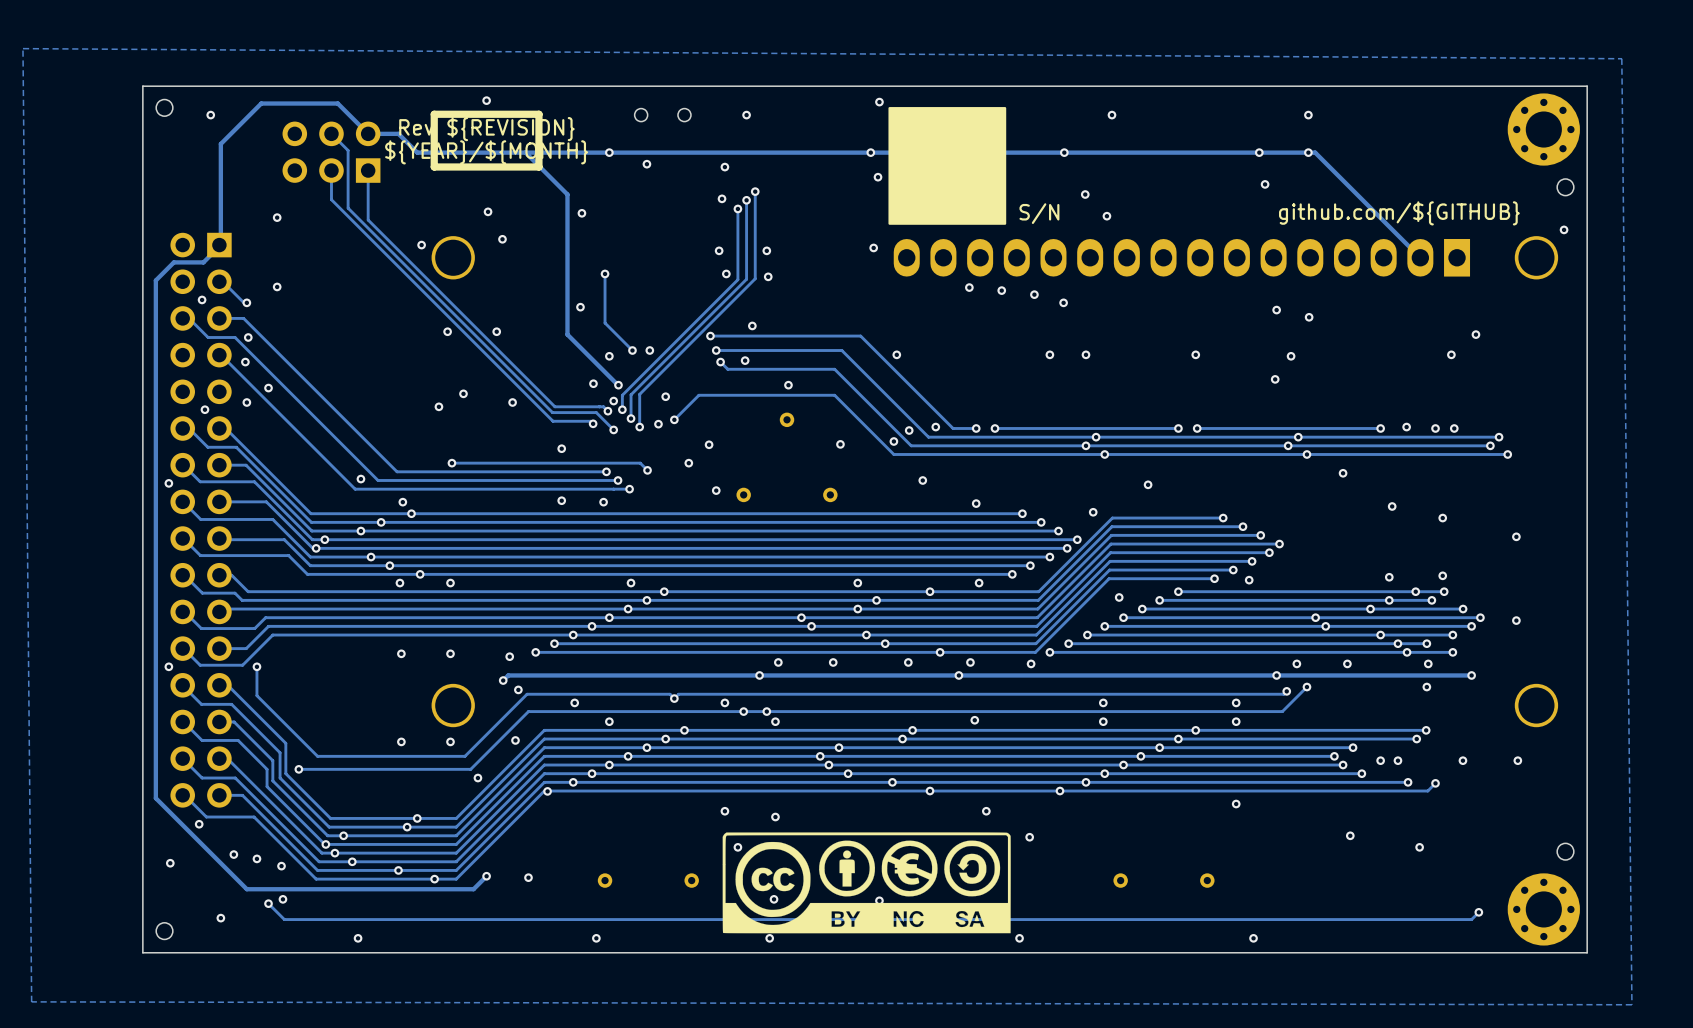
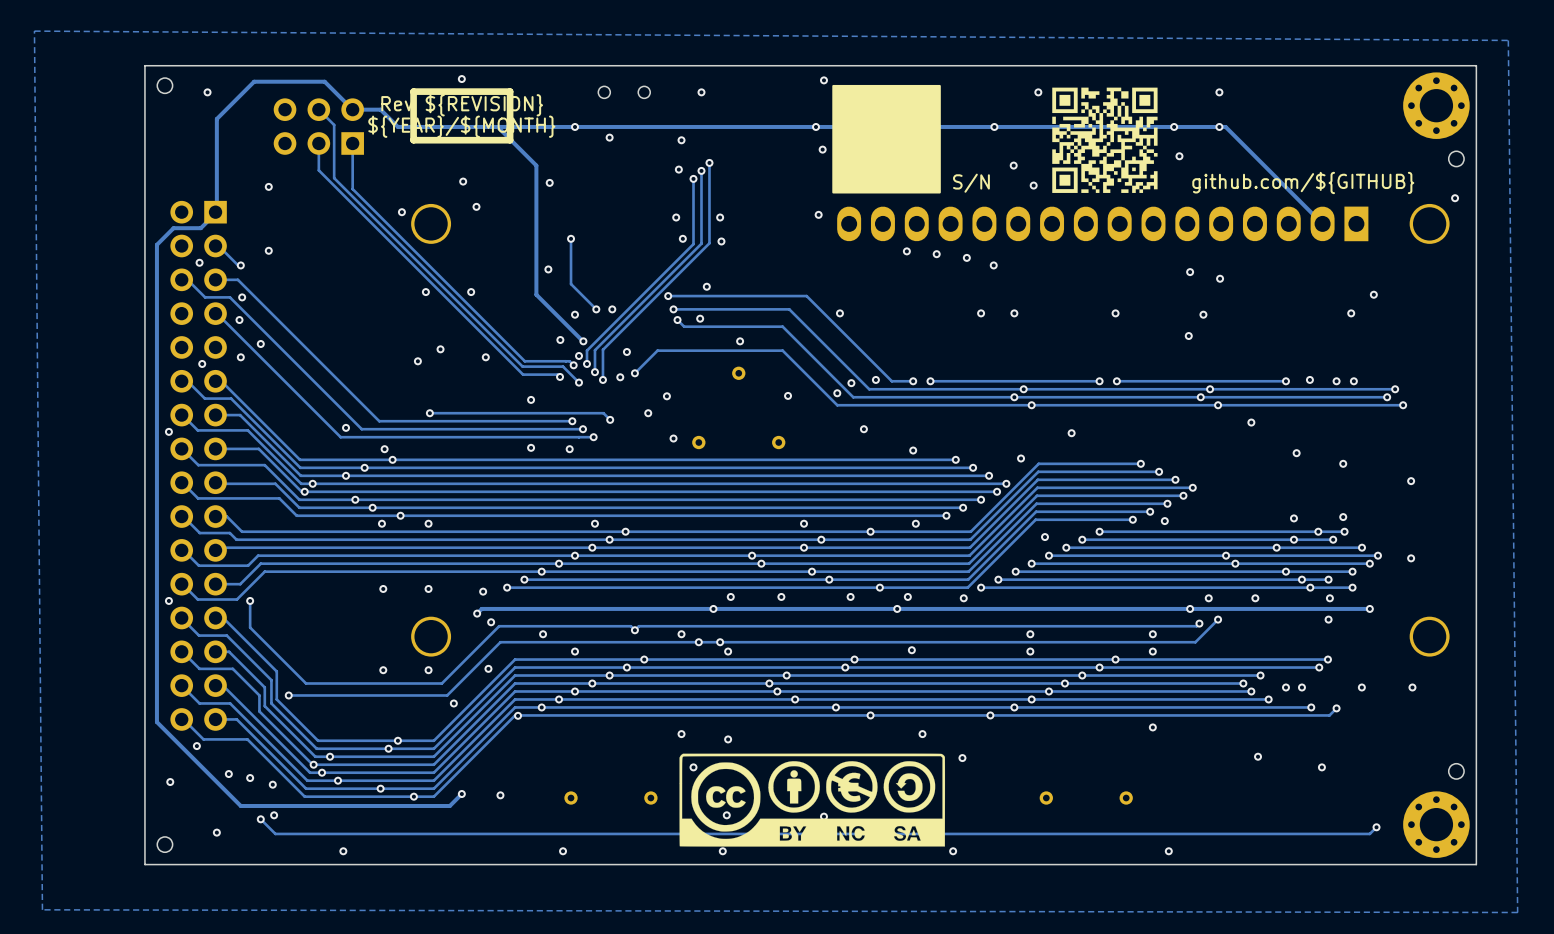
drawing: none -> [1052, 87, 1158, 193]

